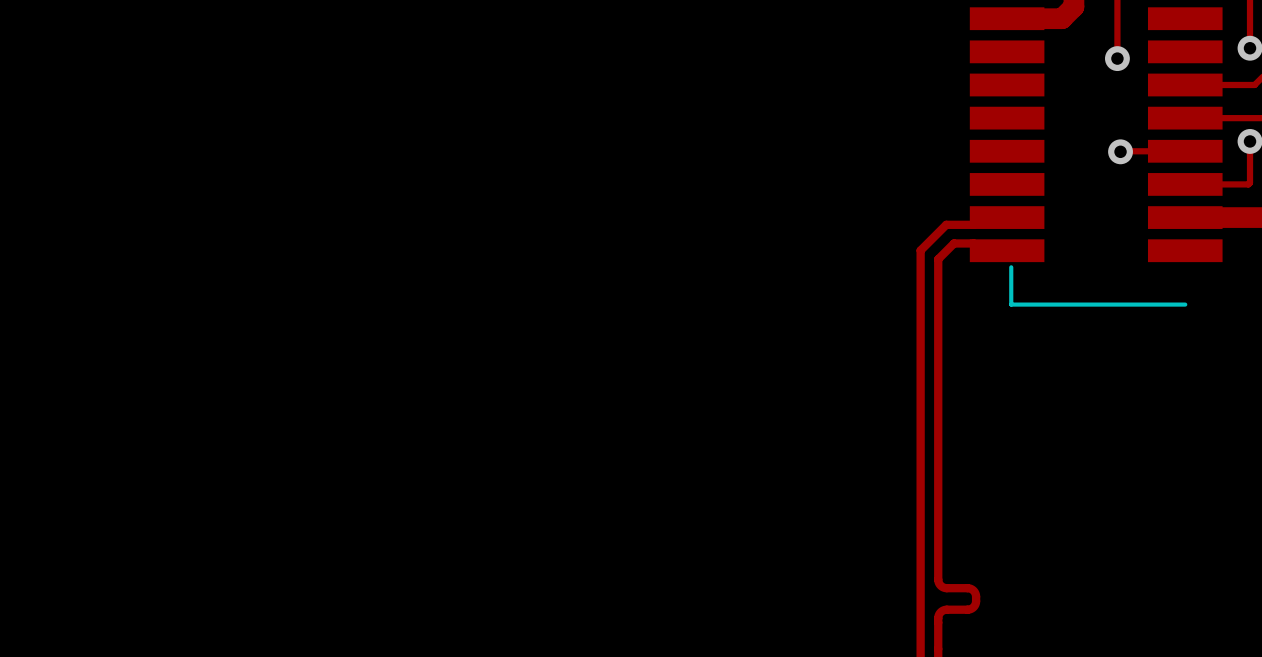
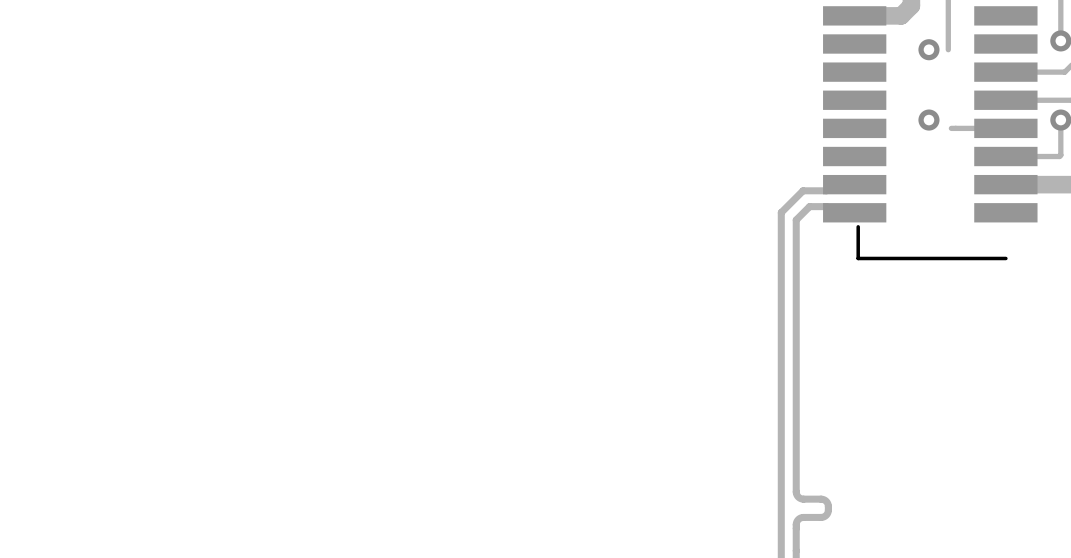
via position: (1117, 58) -> (928, 49)
via position: (1120, 151) -> (928, 120)

